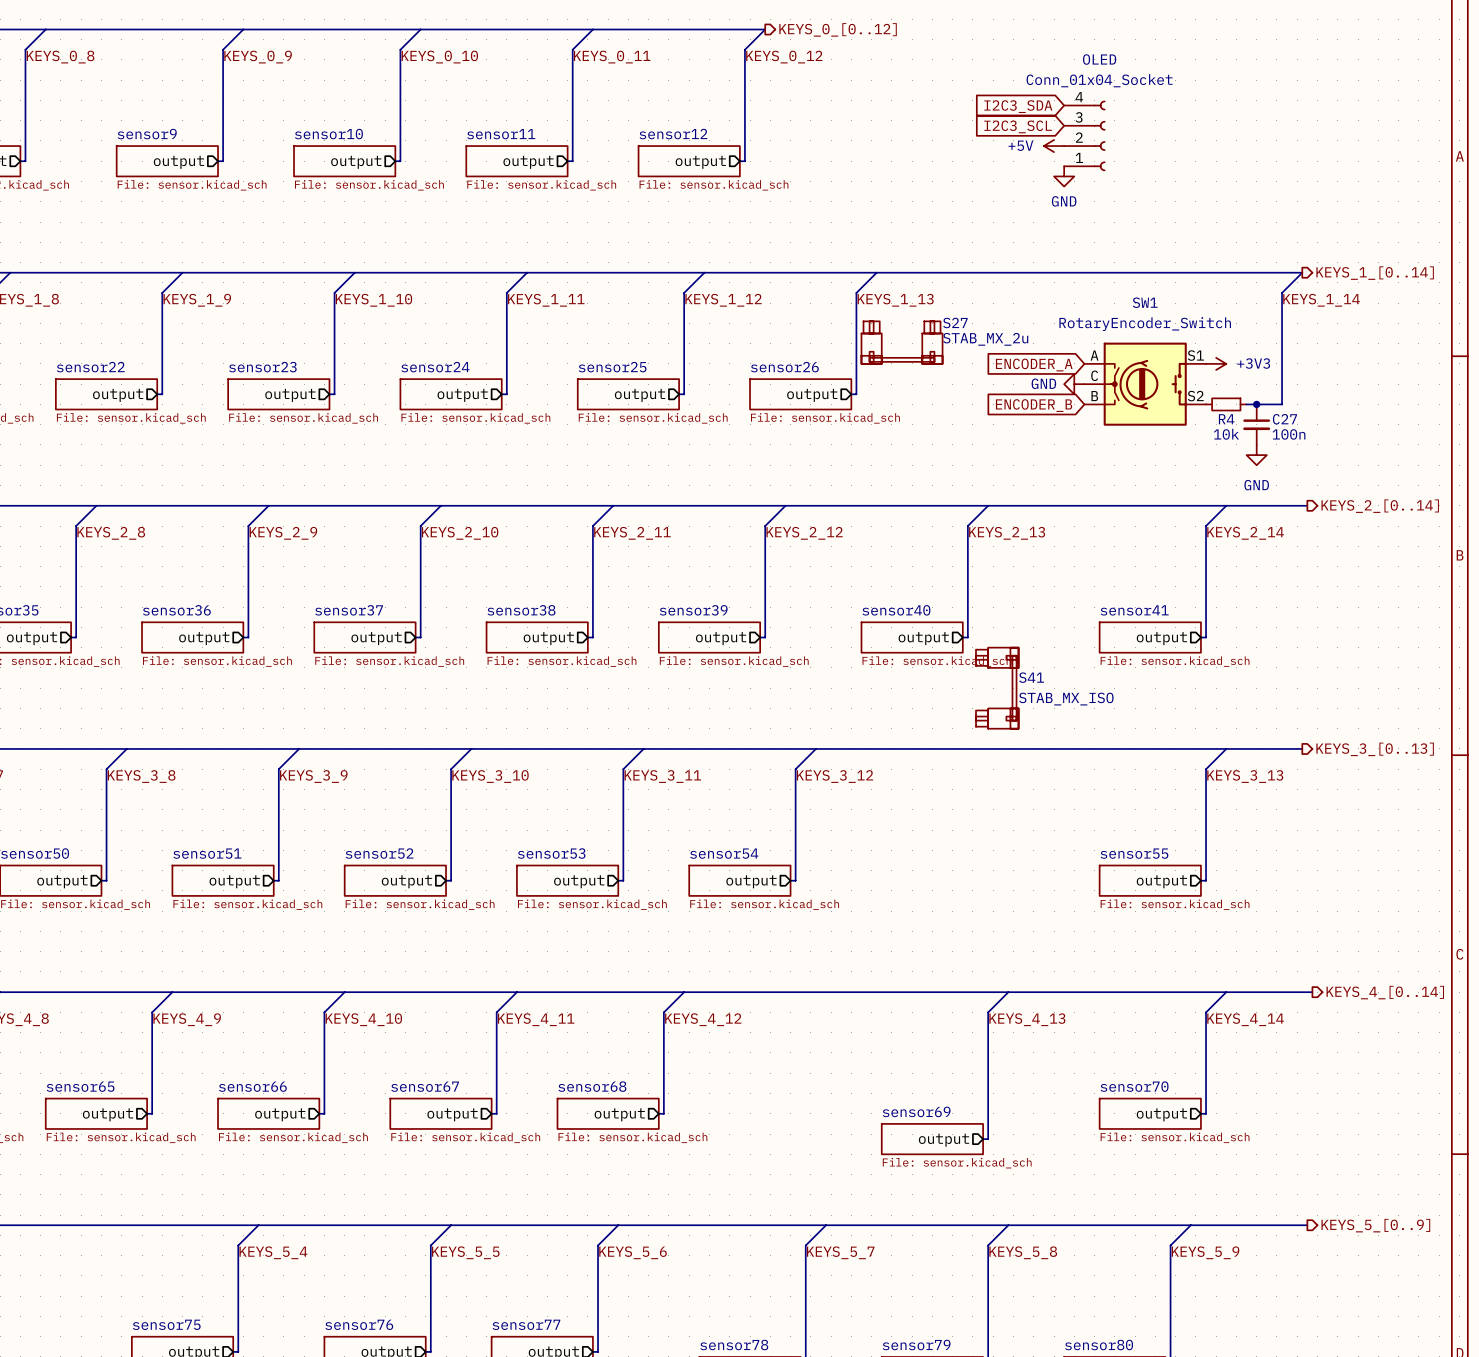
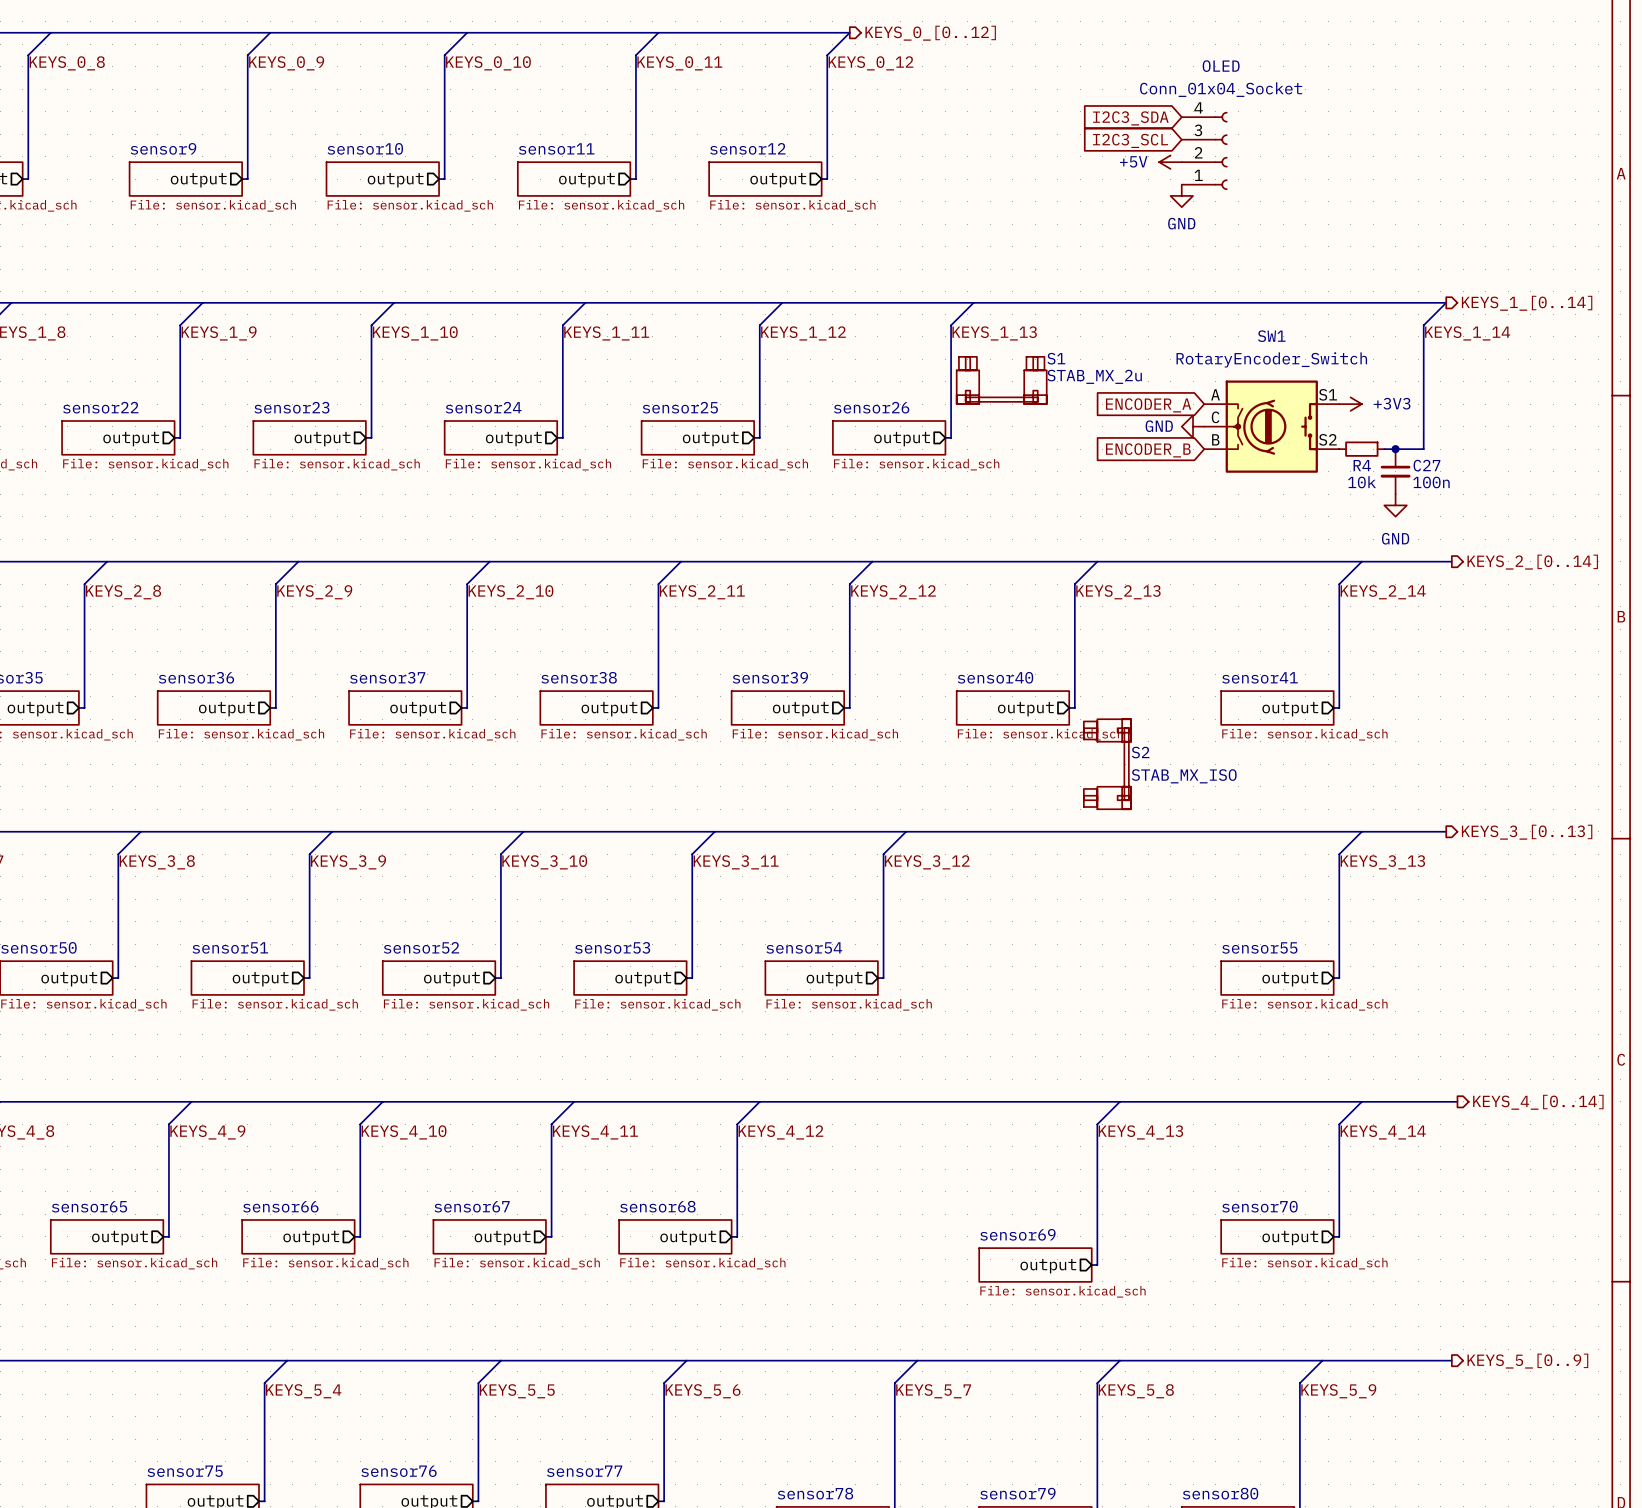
S27 name: S27 (955, 322) -> S1 (1056, 358)
S41 name: S41 (1031, 677) -> S2 (1140, 752)

